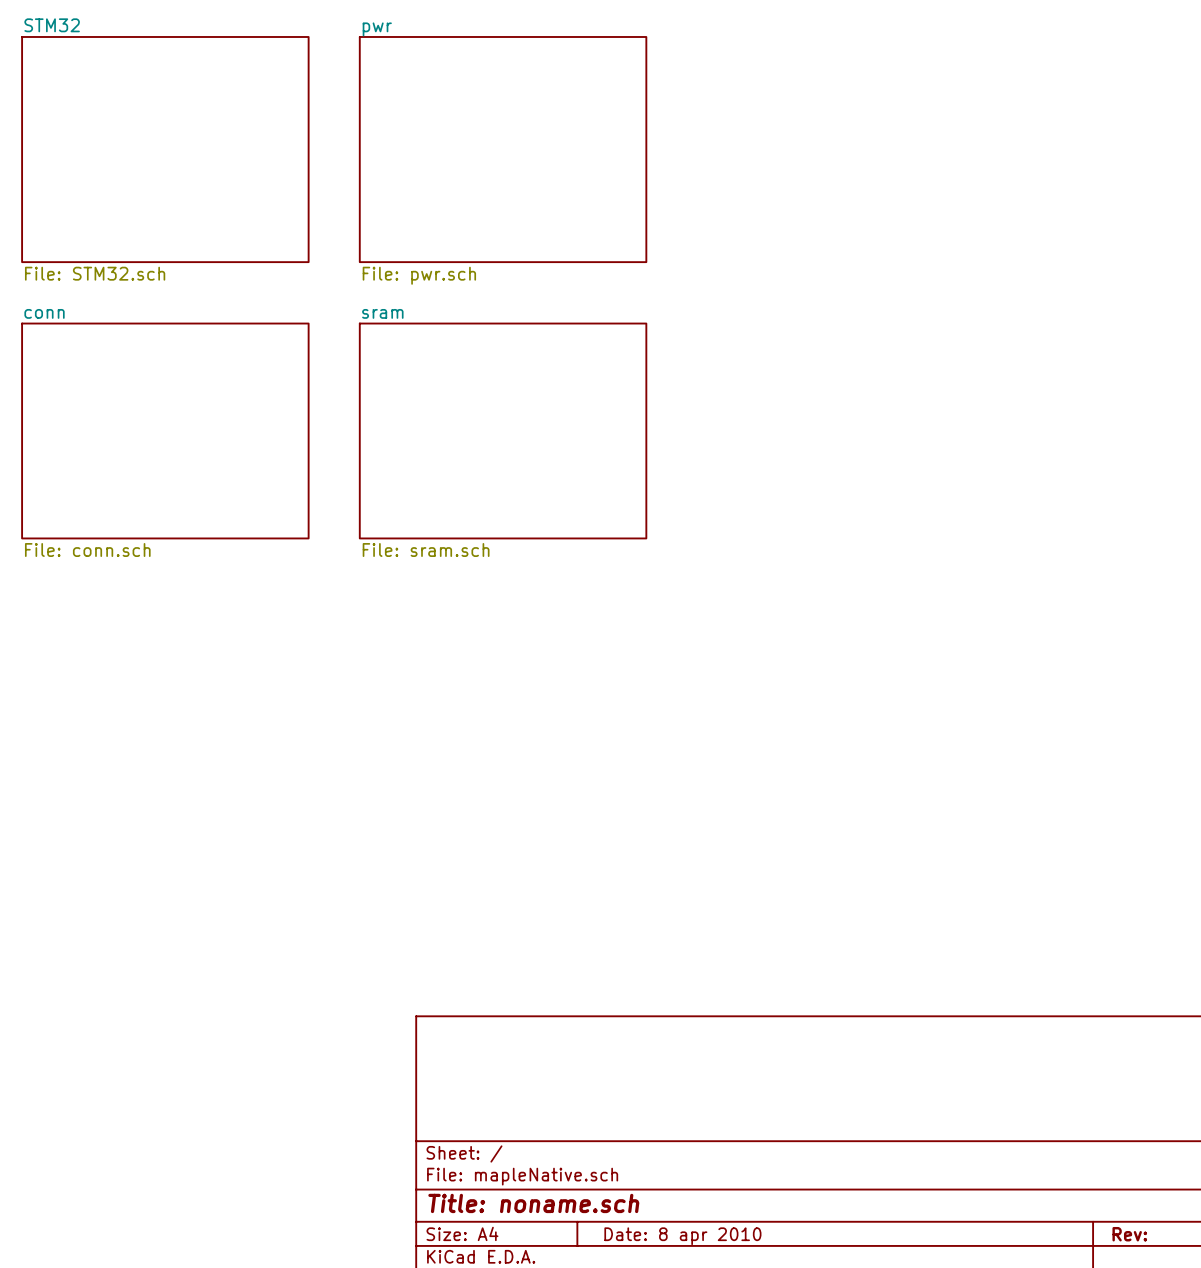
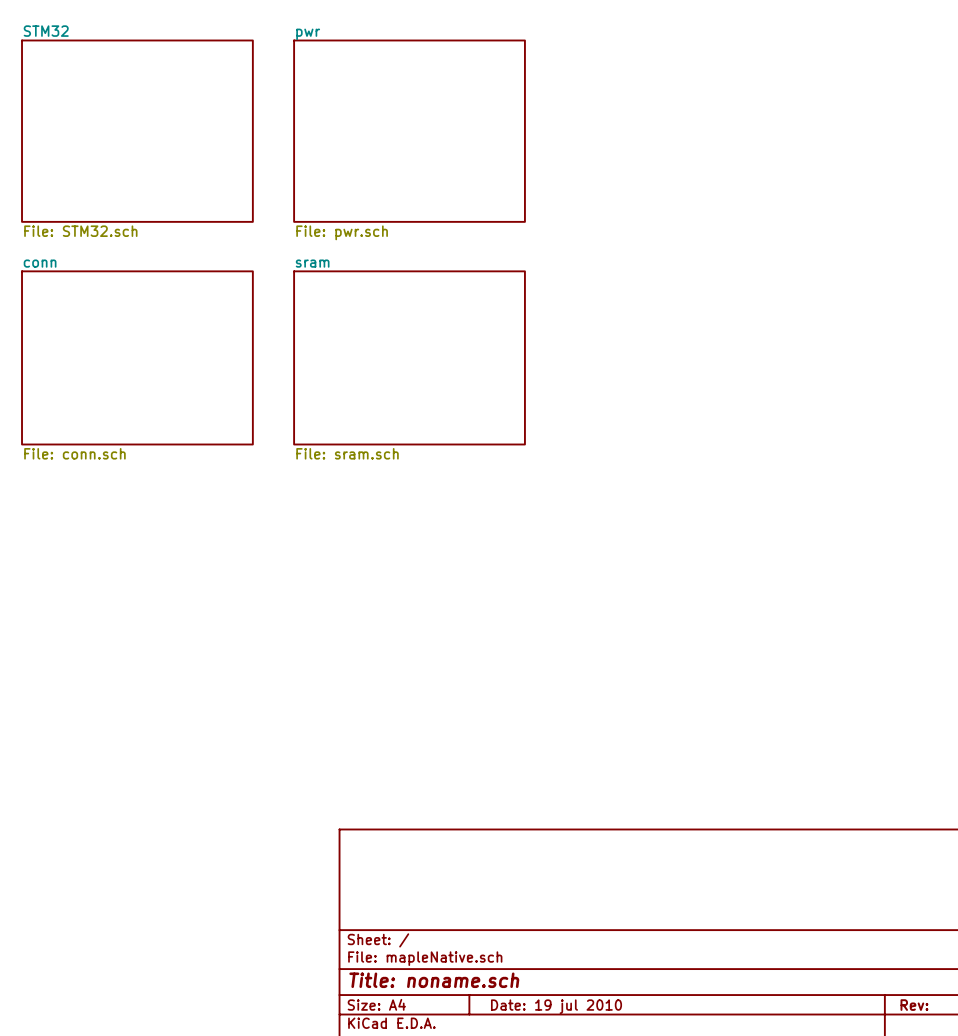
title block: Date: 8 apr 2010 (682, 1236) -> Date: 19 jul 2010 (556, 1006)

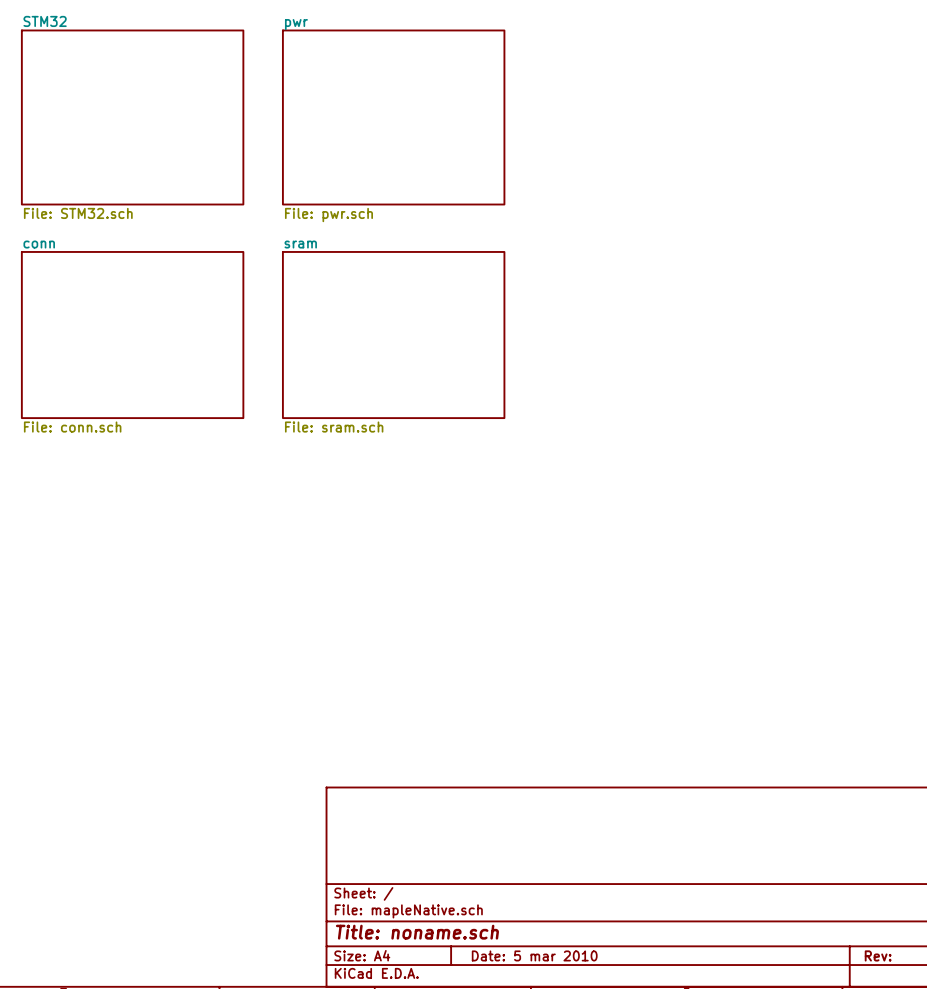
title block: Date: 19 jul 2010 (556, 1006) -> Date: 5 mar 2010 (534, 955)

